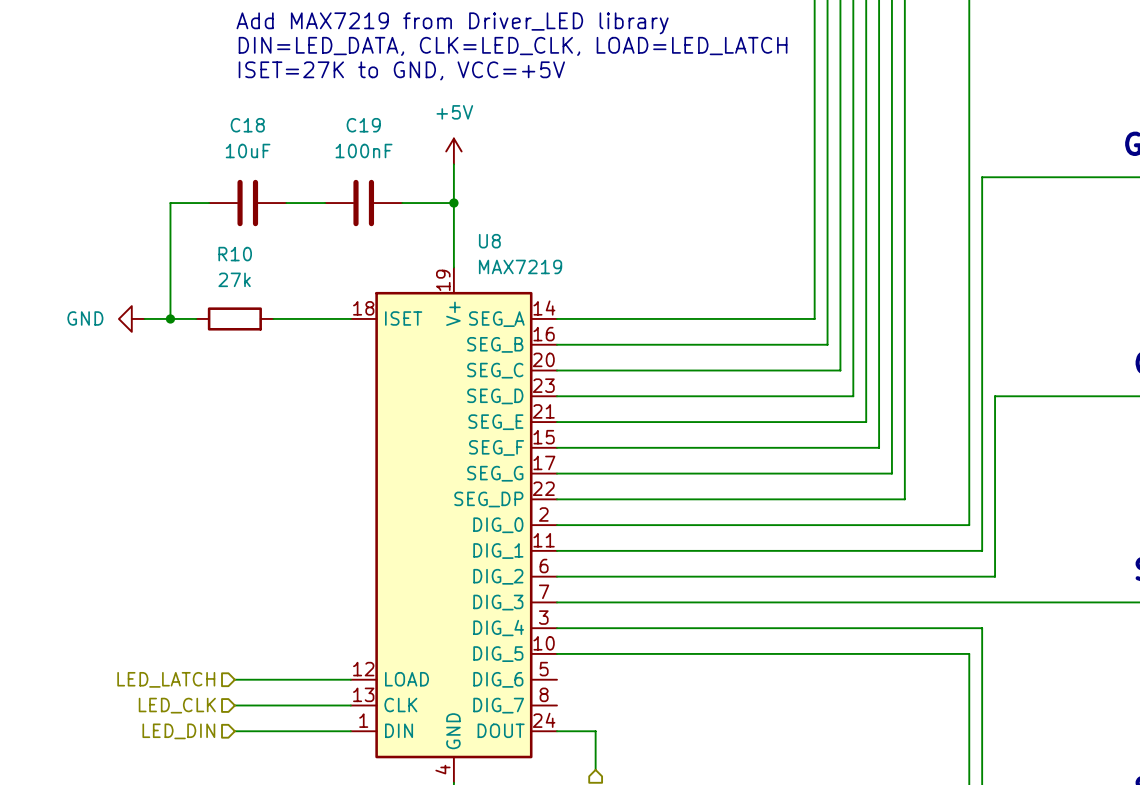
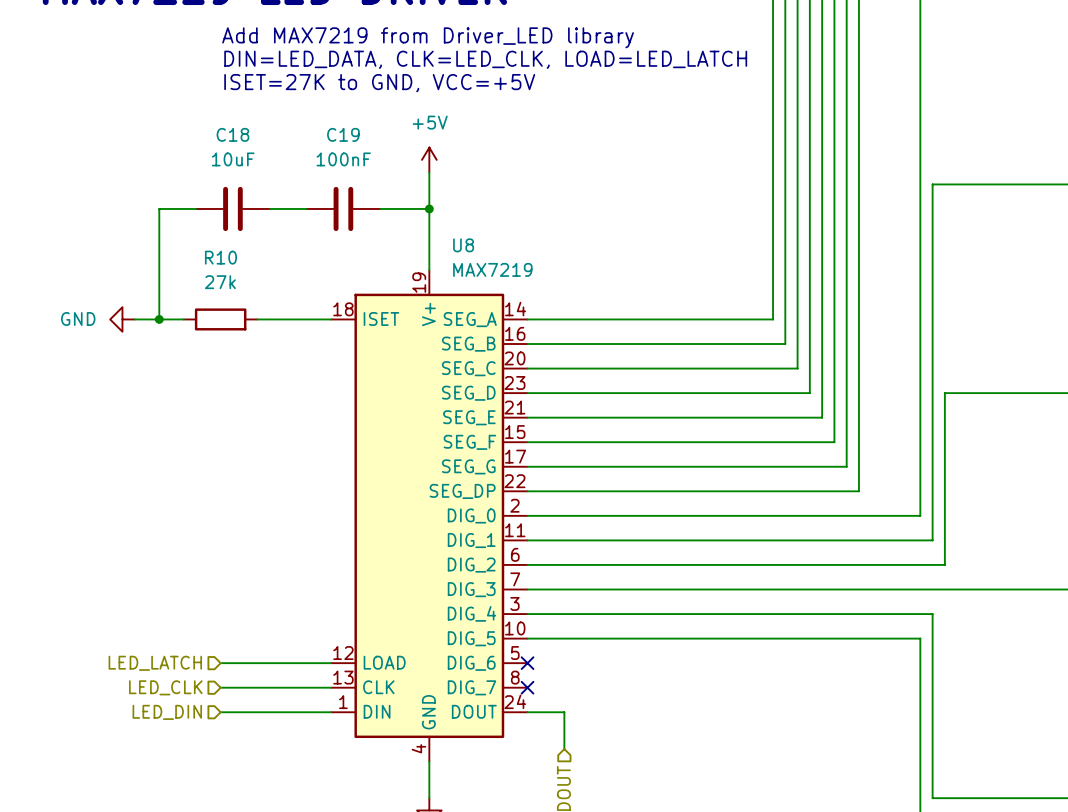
no-connect mark: none -> (527, 663)
no-connect mark: none -> (527, 687)

